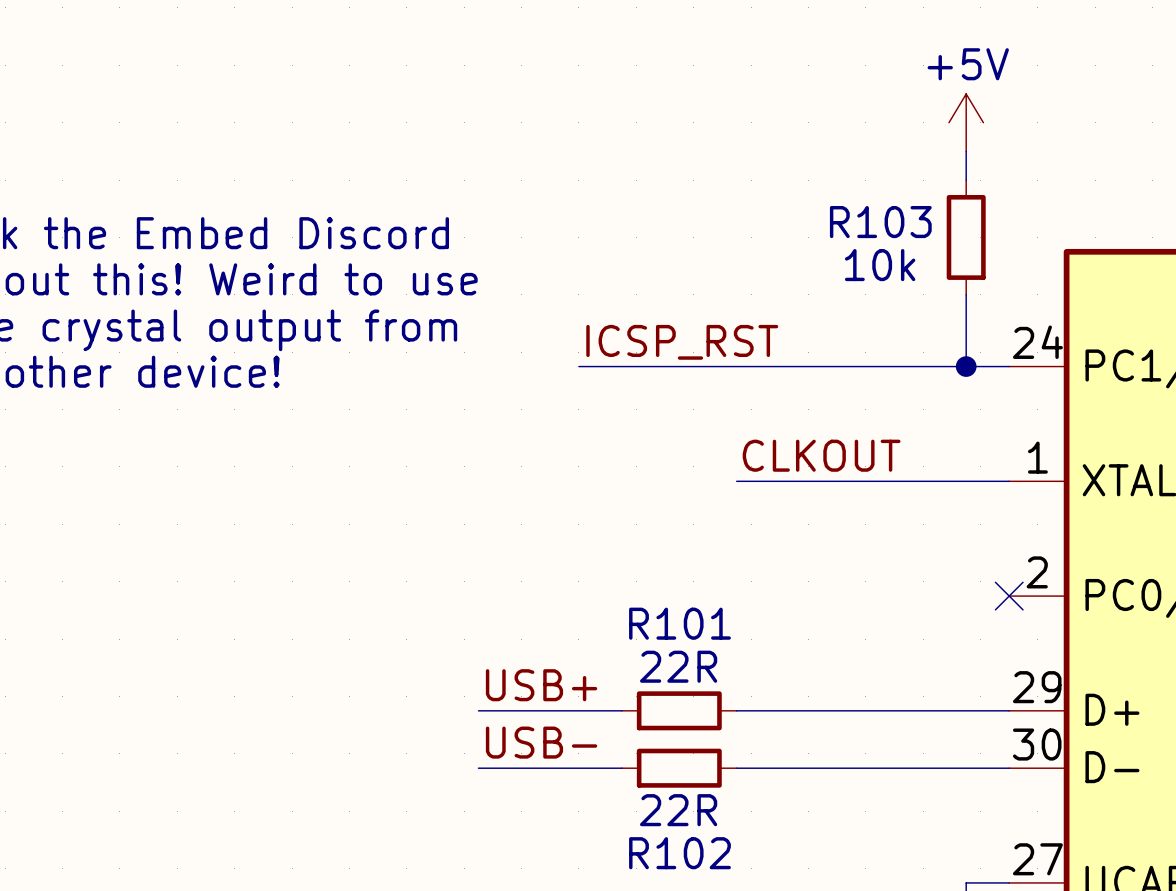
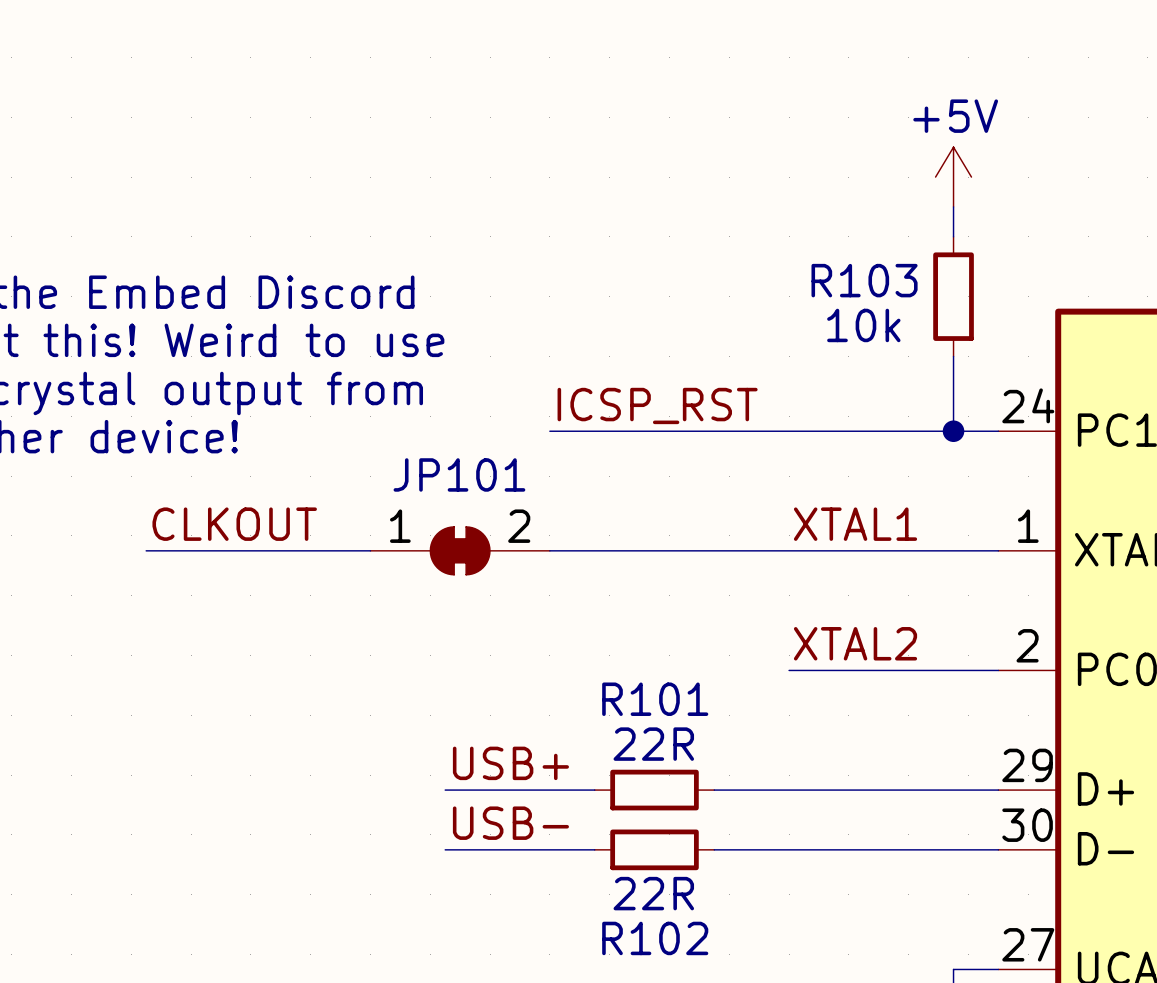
label position: CLKOUT (821, 455) -> CLKOUT (234, 524)
label: none -> XTAL1 (855, 524)
wire: none -> (146, 550) (370, 550)
JP101: none -> (460, 550)
wire: none -> (549, 550) (714, 550)
label: none -> XTAL2 (855, 643)
wire: none -> (789, 670) (998, 670)
no-connect mark: (1009, 596) -> none

